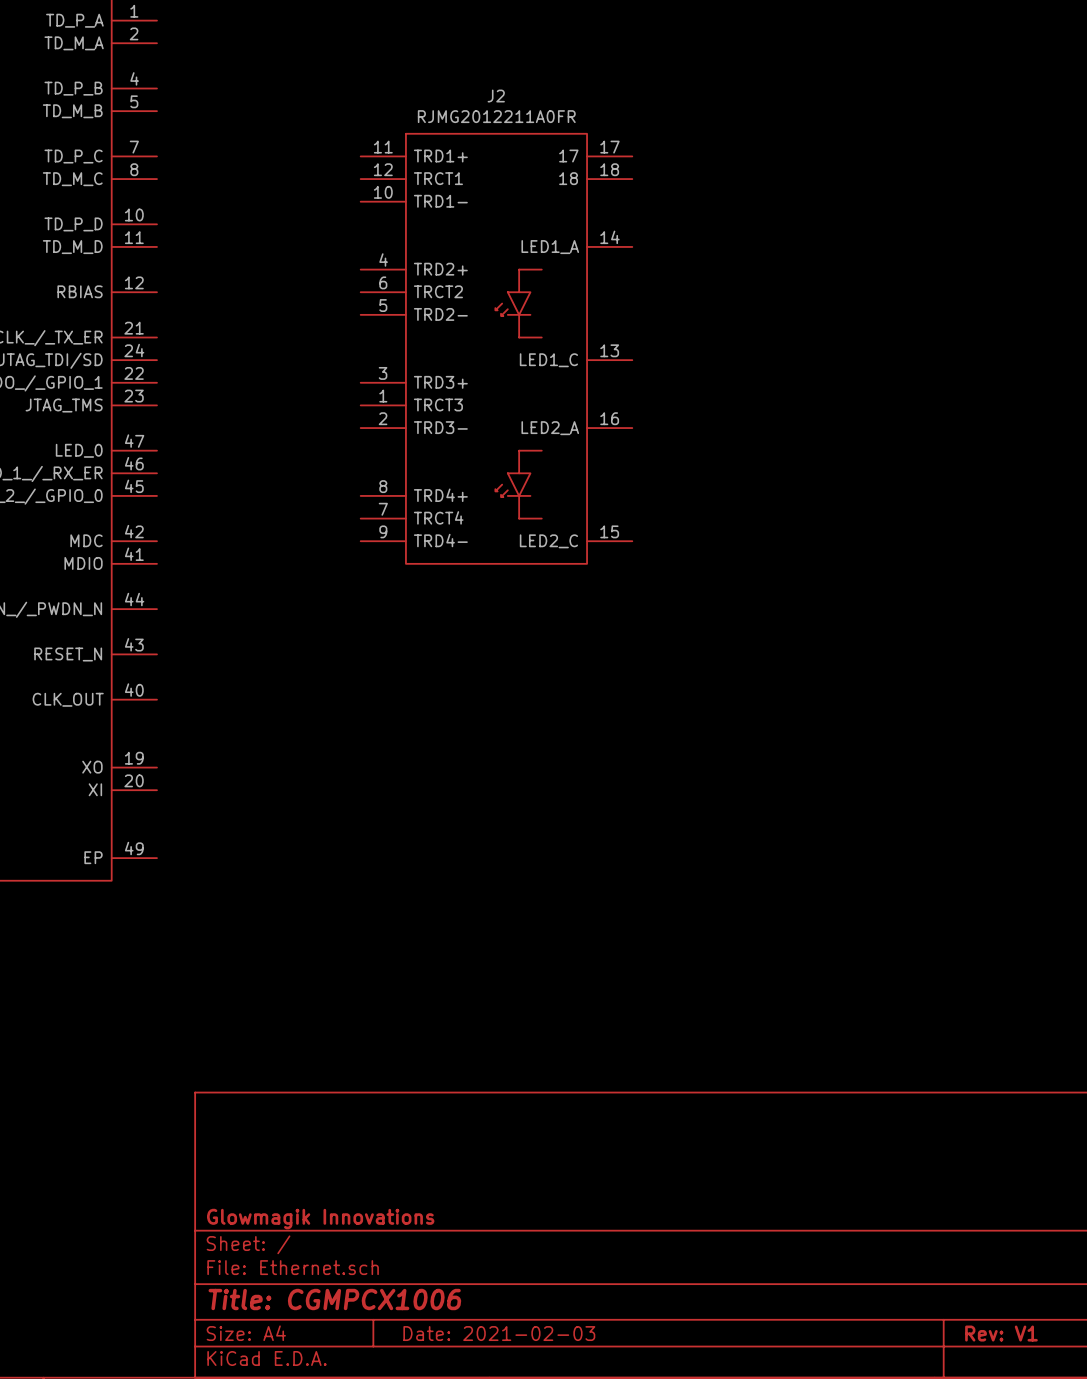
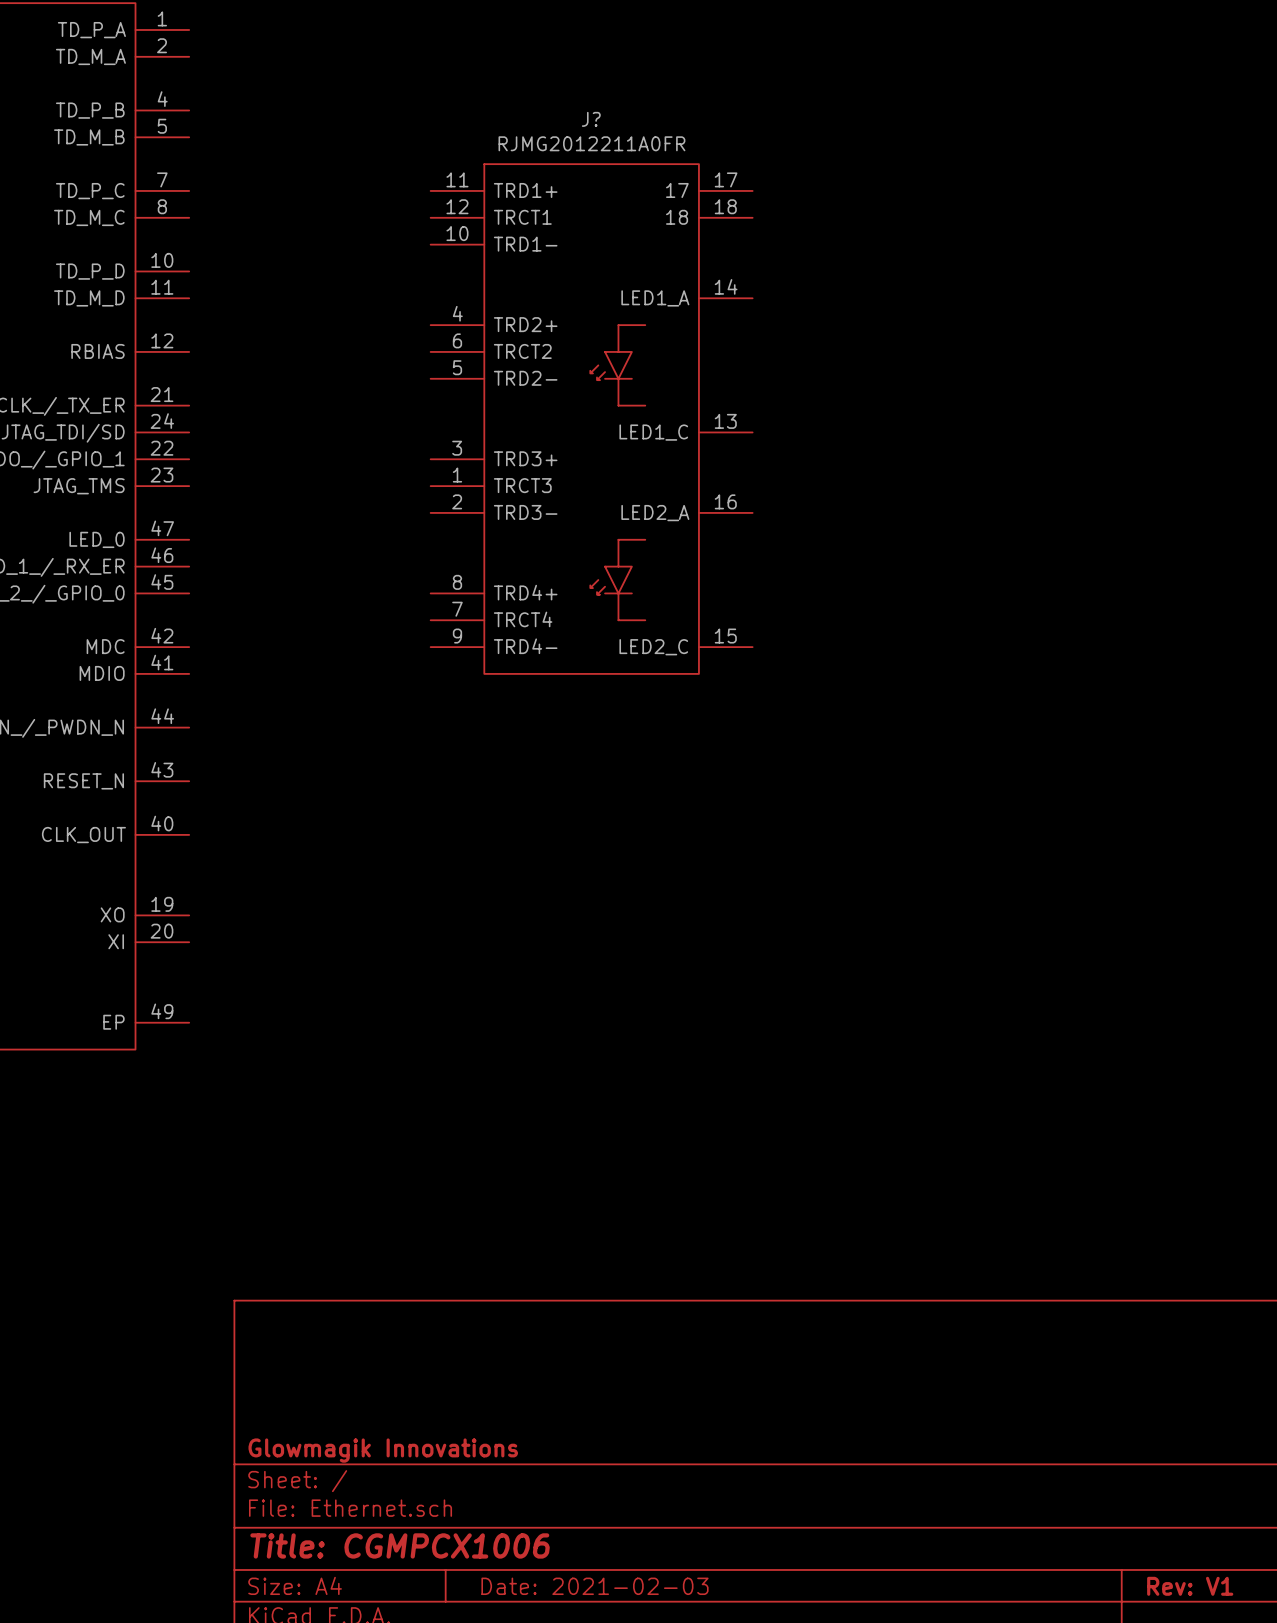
J2 name: J2 (496, 96) -> J? (591, 119)

